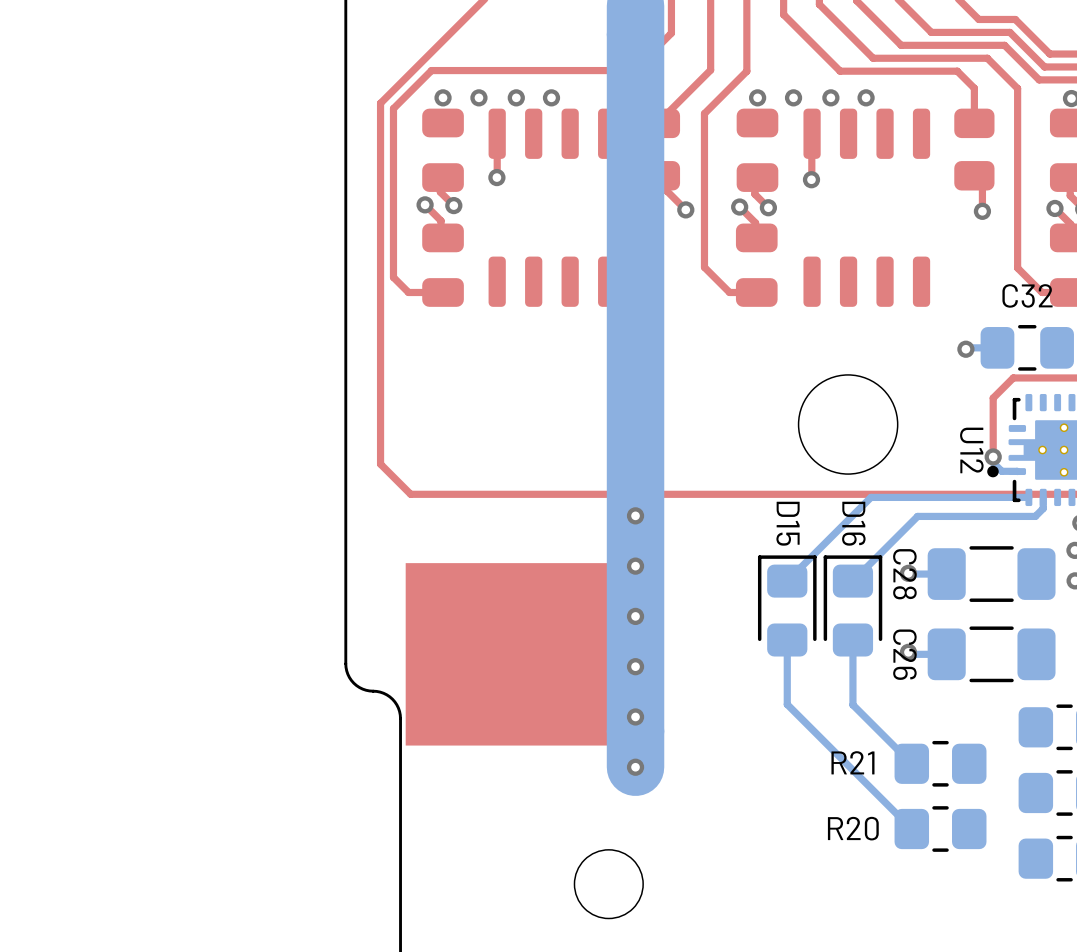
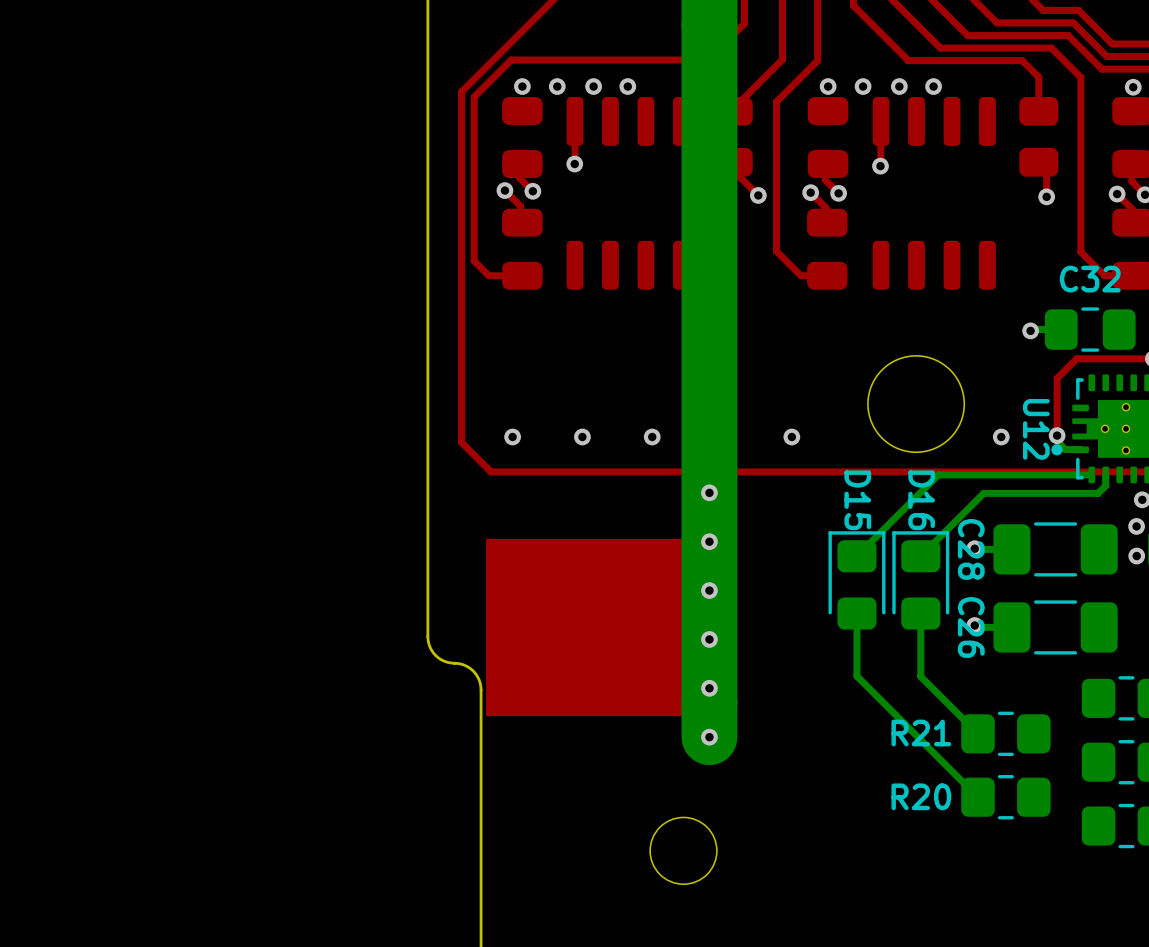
via: none -> (512, 437)
via: none -> (582, 437)
via: none -> (652, 437)
via: none -> (791, 437)
via: none -> (1001, 437)

